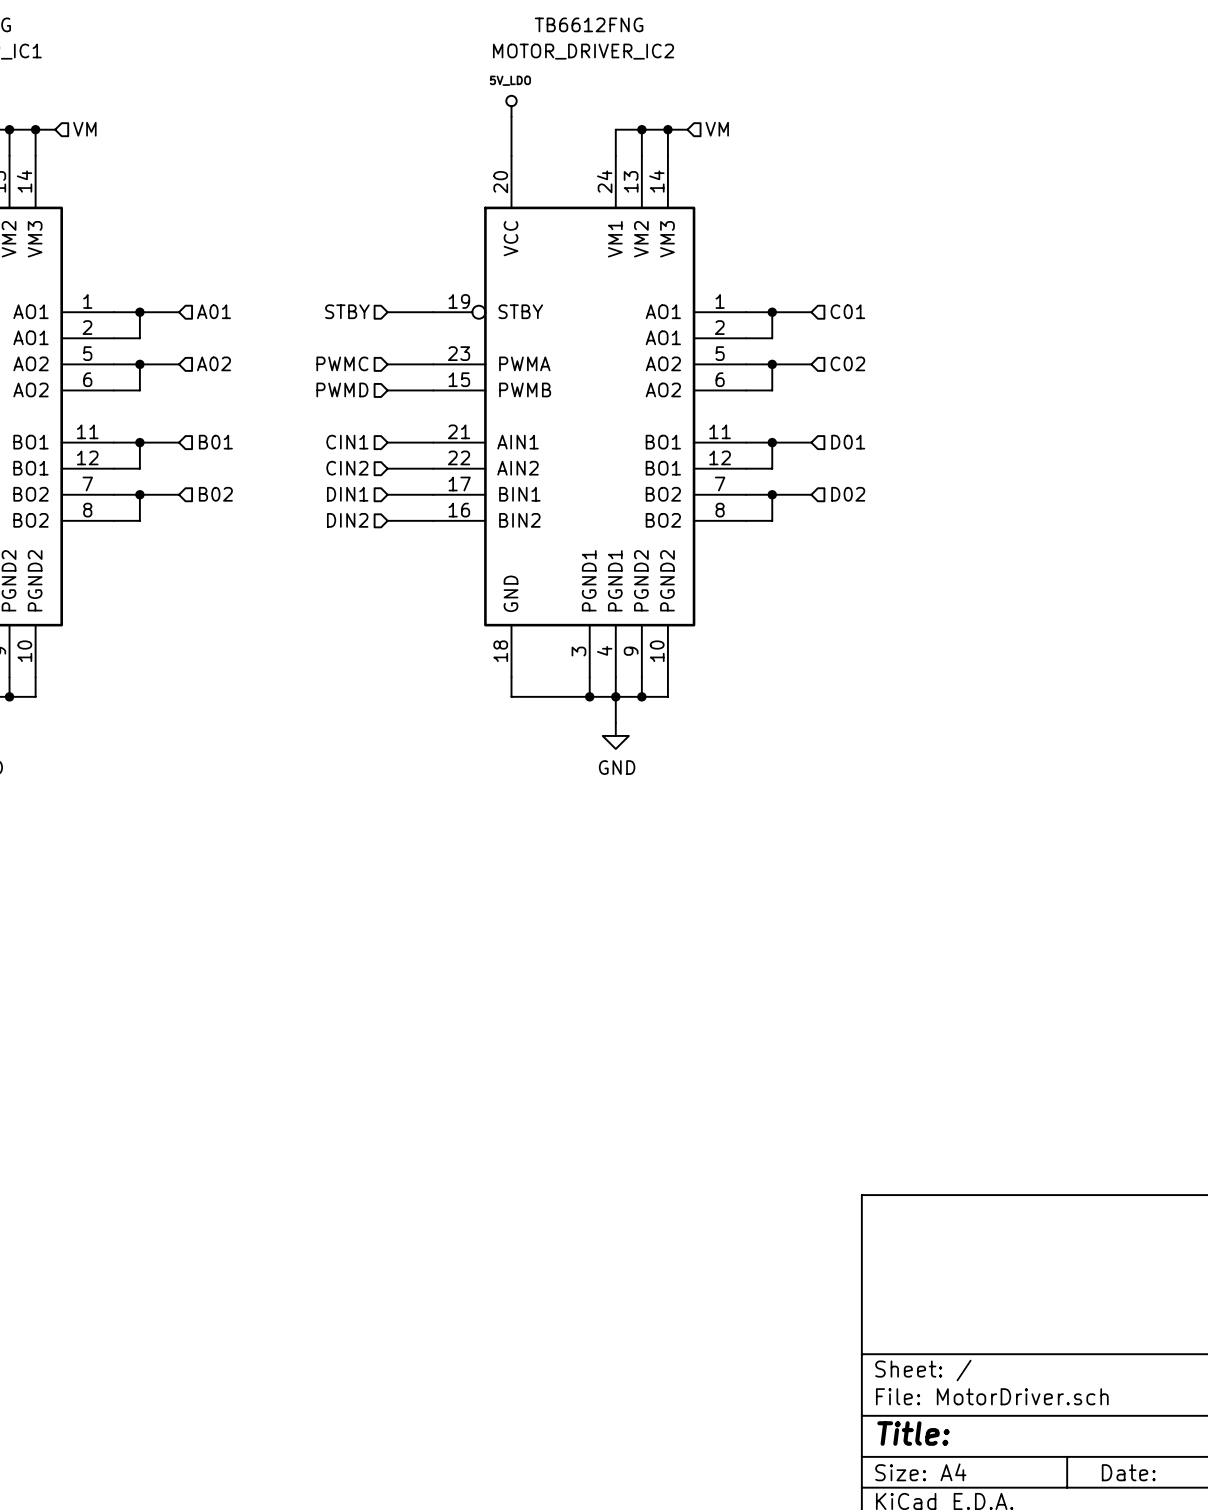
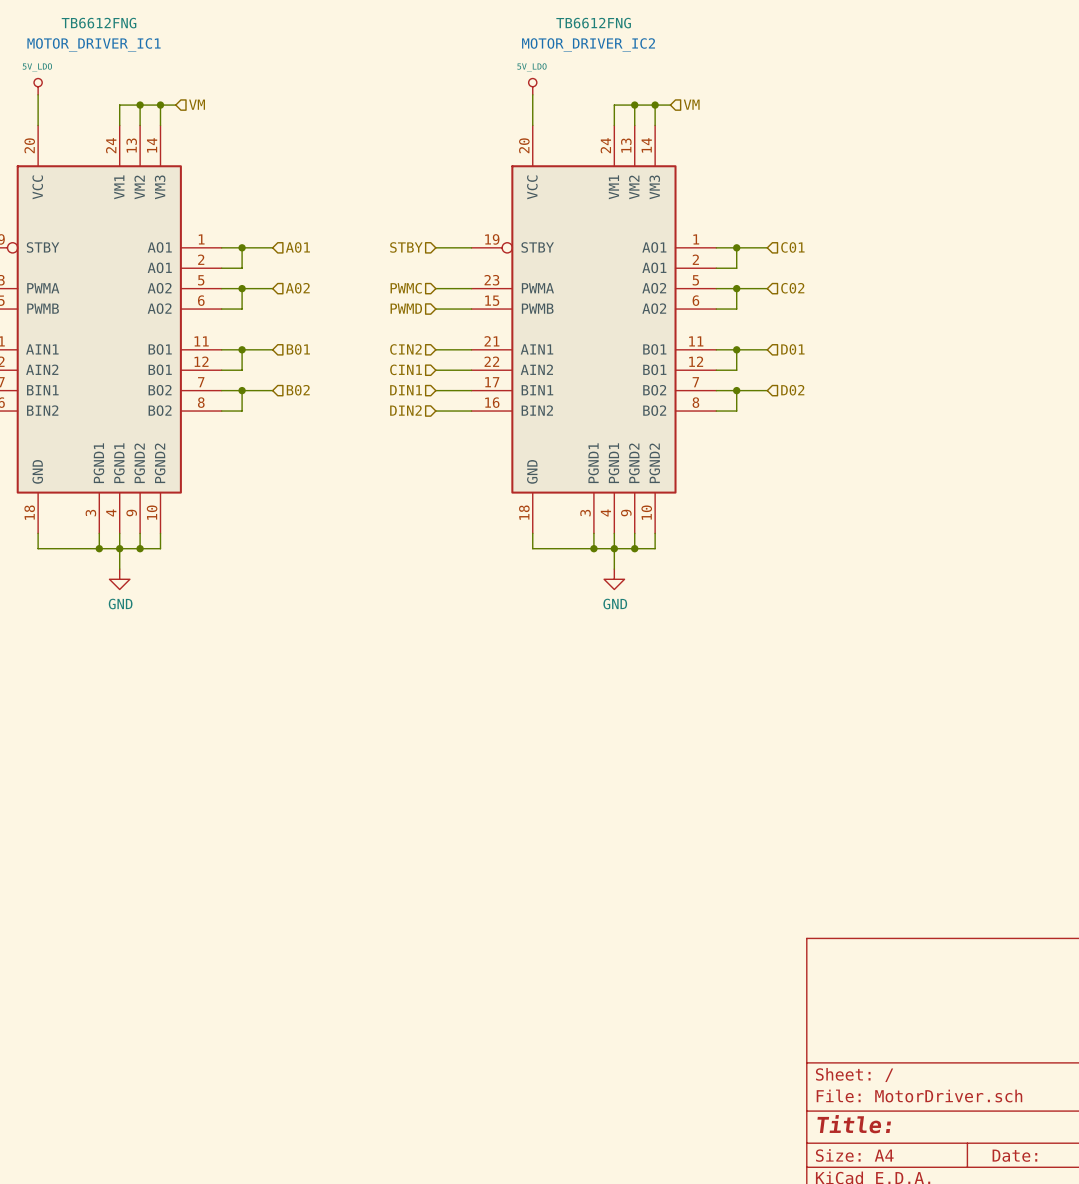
hierarchical label: CIN1 (347, 442) -> CIN2 (405, 349)
hierarchical label: CIN2 (347, 468) -> CIN1 (406, 369)

